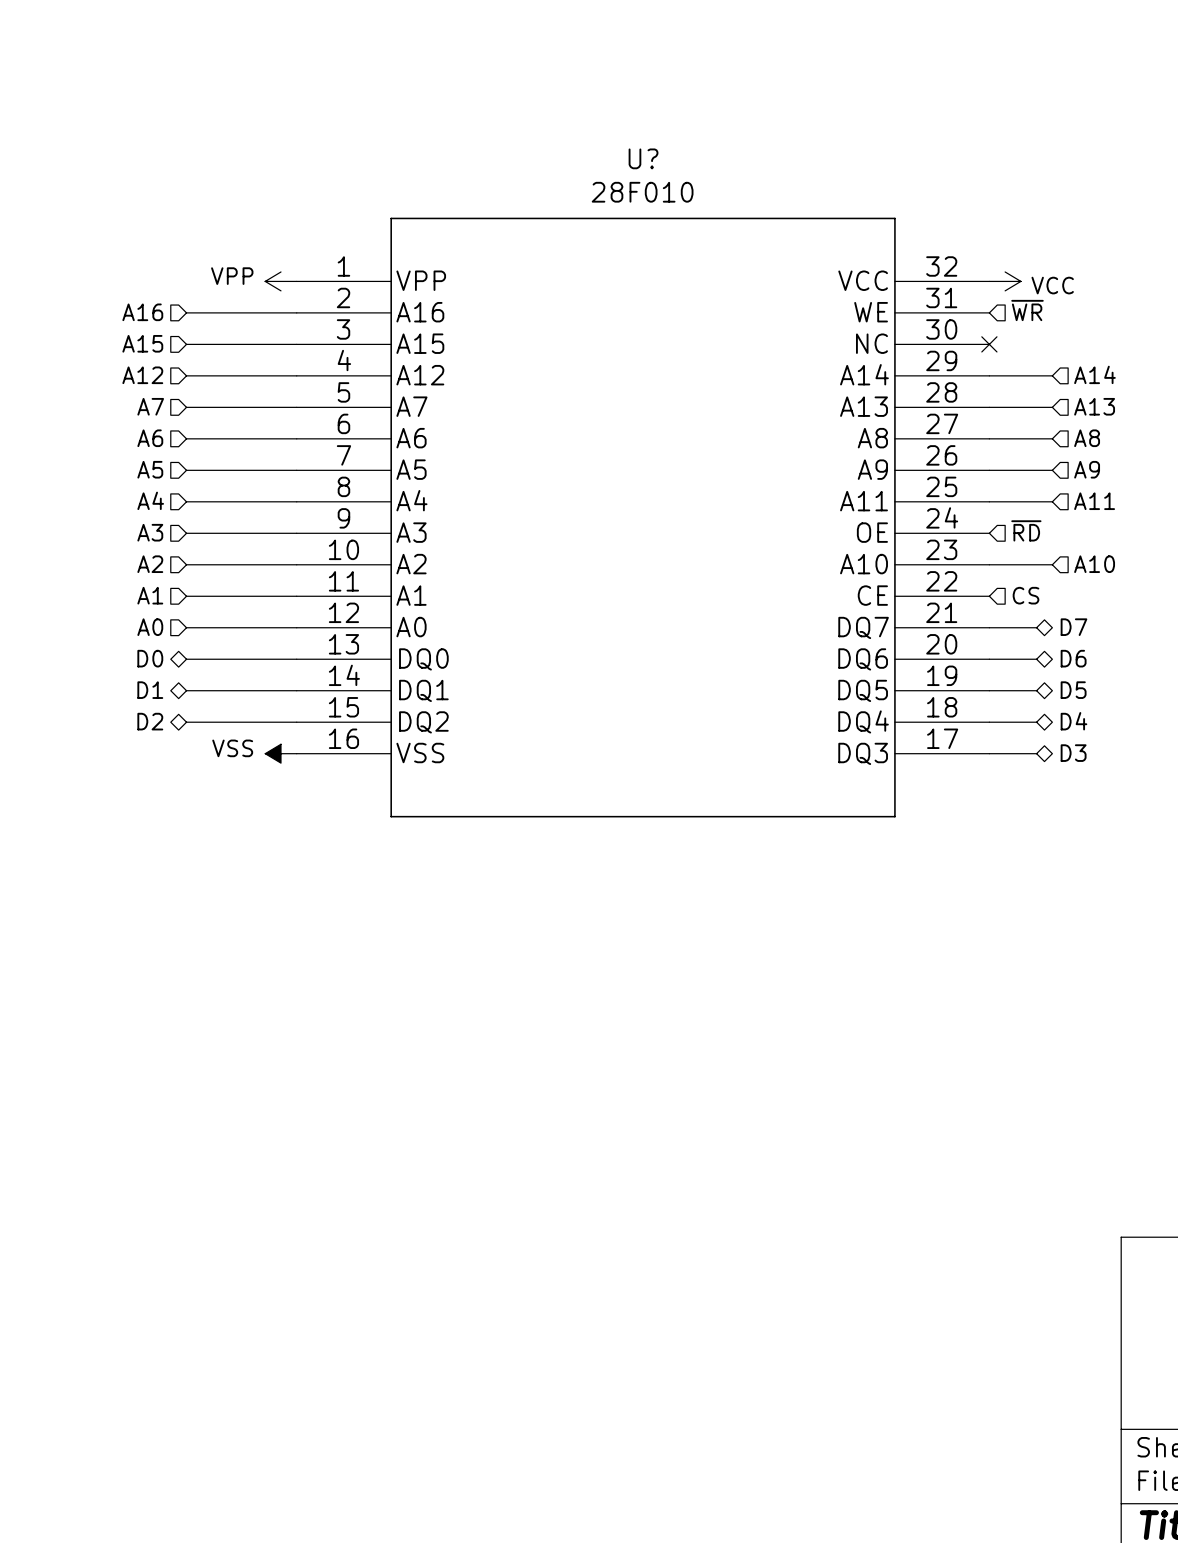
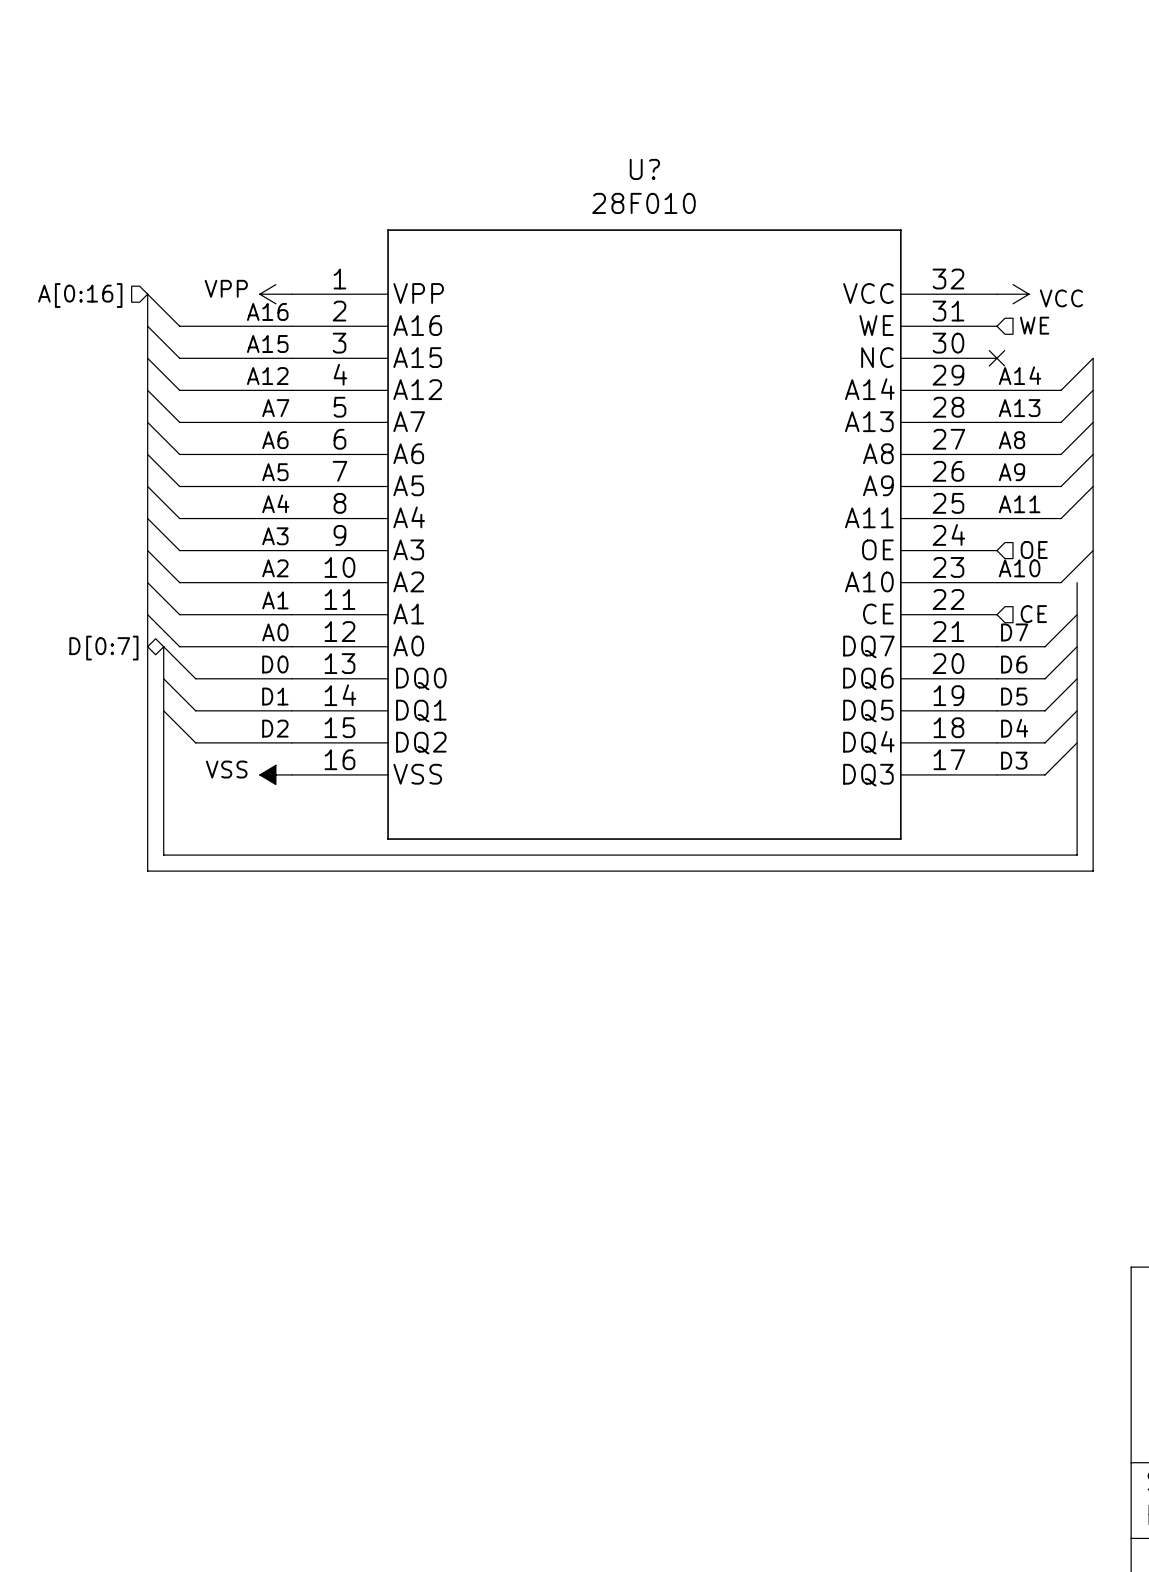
wire: none -> (147, 294) (179, 326)
bus: none -> (147, 294) (147, 871) (1093, 871) (1093, 358)
hierarchical label: none -> A[0:16] (80, 295)
label: none -> A16 (267, 311)
hierarchical label: ~{WR} (1027, 310) -> WE (1034, 325)
hierarchical label: A16 (142, 312) -> none
wire: none -> (147, 326) (179, 358)
label: none -> A15 (267, 344)
hierarchical label: A15 (142, 343) -> none
wire: none -> (147, 358) (179, 390)
wire: none -> (1093, 358) (1061, 390)
label: none -> A12 (267, 376)
label: none -> A14 (1019, 375)
hierarchical label: A14 (1094, 374) -> none
hierarchical label: A12 (142, 375) -> none
wire: none -> (147, 390) (179, 422)
wire: none -> (1093, 390) (1061, 422)
label: none -> A7 (275, 408)
label: none -> A13 (1019, 408)
hierarchical label: A7 (150, 406) -> none
hierarchical label: A13 (1094, 406) -> none
wire: none -> (147, 422) (179, 454)
wire: none -> (1093, 422) (1061, 454)
label: none -> A6 (275, 440)
label: none -> A8 (1011, 440)
hierarchical label: A6 (150, 438) -> none
wire: none -> (147, 454) (179, 486)
wire: none -> (1093, 454) (1061, 486)
hierarchical label: A8 (1087, 438) -> none
label: none -> A5 (275, 472)
label: none -> A9 (1011, 472)
hierarchical label: A5 (150, 469) -> none
hierarchical label: A9 (1087, 469) -> none
wire: none -> (147, 486) (179, 518)
wire: none -> (1093, 486) (1061, 518)
label: none -> A4 (275, 503)
label: none -> A11 (1019, 504)
hierarchical label: A4 (150, 500) -> none
wire: none -> (147, 518) (179, 550)
hierarchical label: A11 (1094, 501) -> none
label: none -> A3 (275, 536)
hierarchical label: ~{RD} (1026, 530) -> OE (1034, 550)
hierarchical label: A3 (150, 532) -> none
wire: none -> (147, 550) (179, 582)
wire: none -> (1093, 550) (1061, 582)
label: none -> A2 (275, 568)
label: none -> A10 (1019, 568)
hierarchical label: A2 (150, 564) -> none
wire: none -> (147, 582) (179, 614)
bus: none -> (1077, 582) (1077, 855) (163, 855) (163, 646)
hierarchical label: A10 (1094, 564) -> none
label: none -> A1 (275, 600)
hierarchical label: A1 (150, 595) -> none
hierarchical label: CS (1026, 595) -> CE (1033, 614)
wire: none -> (147, 614) (179, 646)
wire: none -> (1077, 614) (1045, 646)
label: none -> A0 (275, 632)
label: none -> D7 (1014, 632)
hierarchical label: A0 (150, 627) -> none
wire: none -> (1077, 646) (1045, 678)
hierarchical label: D7 (1073, 627) -> none
hierarchical label: none -> D[0:7] (103, 648)
label: none -> D0 (275, 664)
label: none -> D6 (1014, 664)
hierarchical label: D0 (150, 658) -> none
hierarchical label: D6 (1073, 658) -> none
wire: (186, 659) (202, 659) -> (163, 646) (195, 678)
wire: none -> (1077, 678) (1045, 710)
label: none -> D1 (275, 696)
label: none -> D5 (1014, 696)
hierarchical label: D1 (150, 690) -> none
wire: (186, 690) (202, 690) -> (163, 678) (195, 710)
wire: none -> (1077, 710) (1045, 742)
hierarchical label: D5 (1073, 690) -> none
label: none -> D4 (1014, 728)
label: none -> D2 (275, 728)
hierarchical label: D2 (150, 721) -> none
hierarchical label: D4 (1073, 721) -> none
wire: (186, 722) (202, 722) -> (163, 710) (195, 742)
wire: none -> (1077, 742) (1045, 774)
label: none -> D3 (1014, 760)
hierarchical label: D3 (1073, 753) -> none

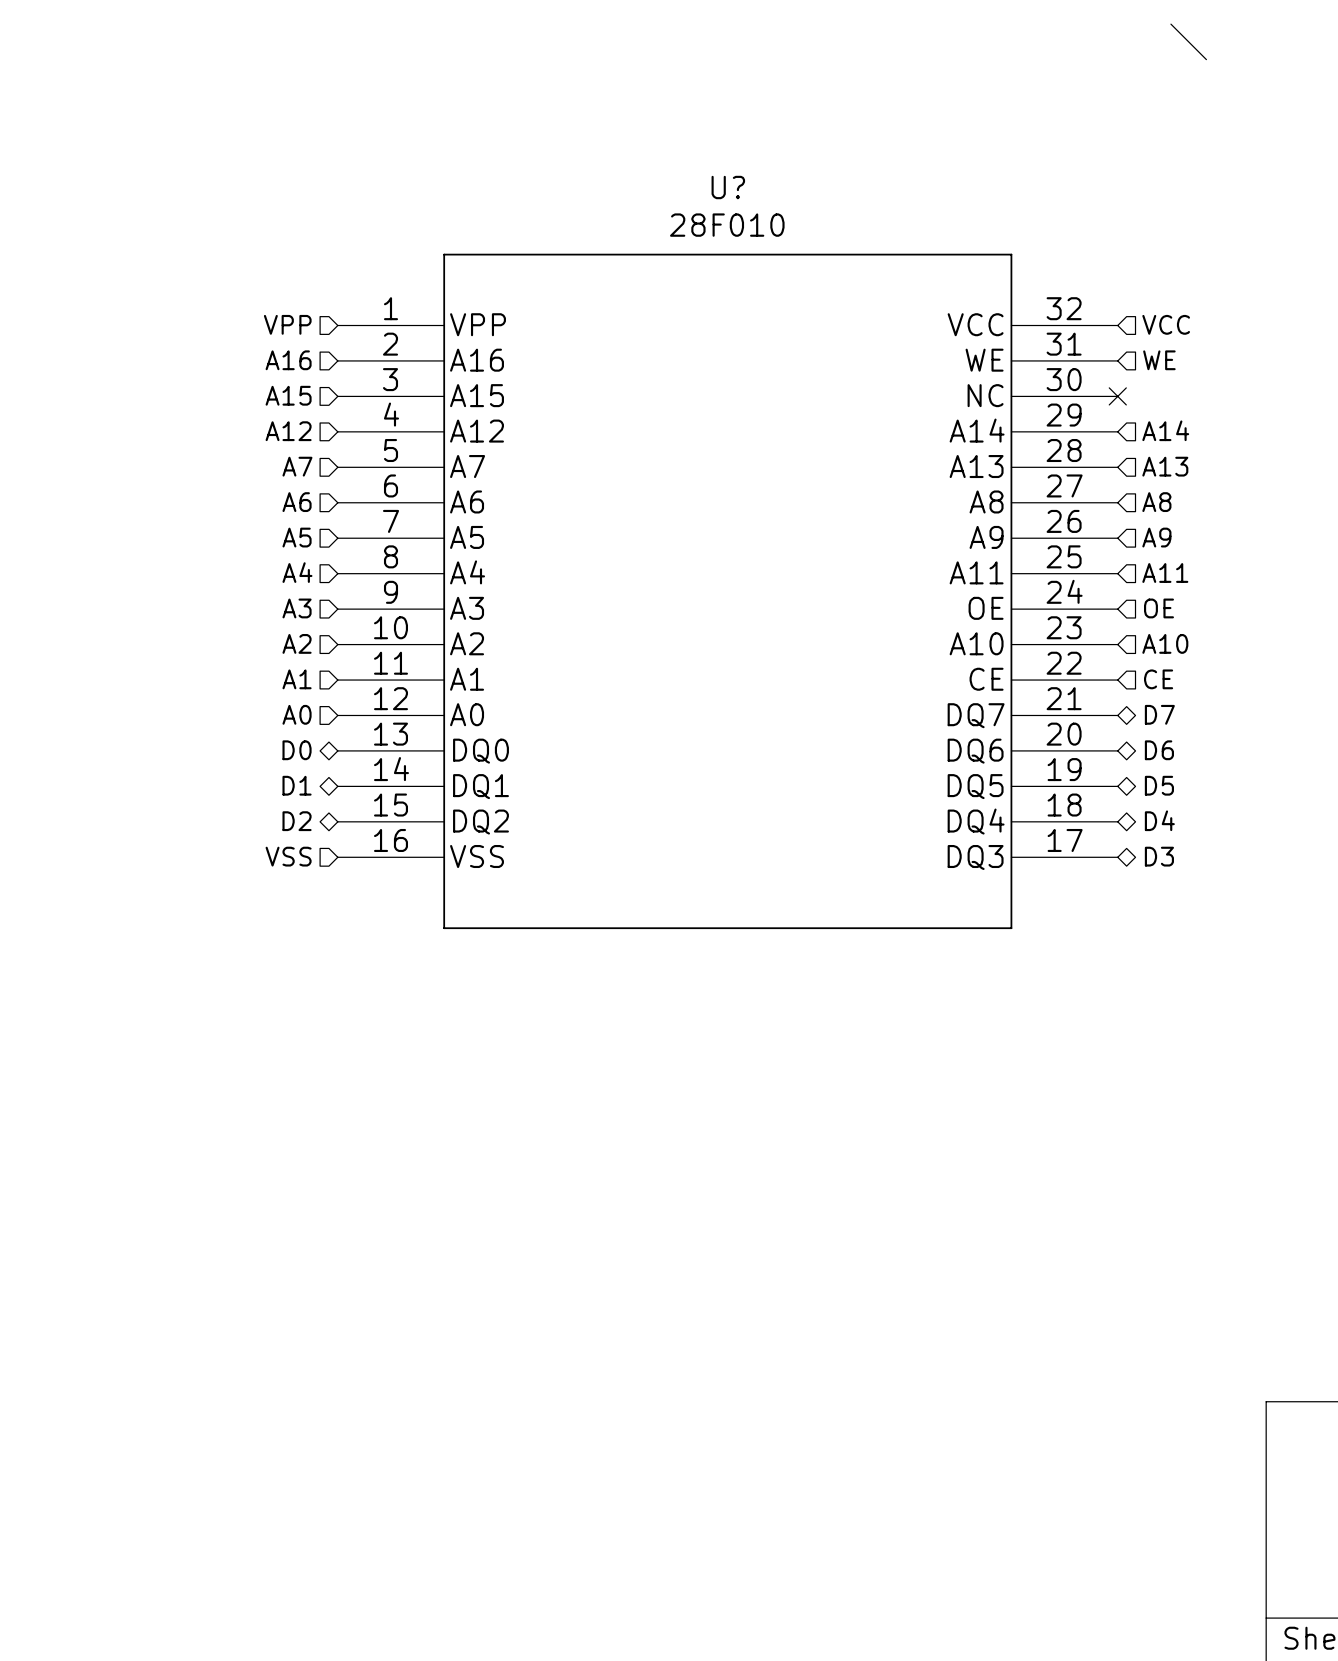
wire: none -> (1170, 24) (1206, 59)
hierarchical label: none -> VPP (287, 324)
hierarchical label: none -> VCC (1166, 324)
wire: (147, 294) (179, 326) (291, 326) -> none
bus: (147, 294) (147, 871) (1093, 871) (1093, 358) -> none
power symbol: VPP (275, 294) -> none
power symbol: VCC (1013, 294) -> none
hierarchical label: A[0:16] (80, 295) -> none
label: A16 (267, 311) -> none
hierarchical label: none -> A16 (288, 360)
wire: (147, 326) (179, 358) (291, 358) -> none
label: A15 (267, 344) -> none
hierarchical label: none -> A15 (288, 395)
wire: (147, 358) (179, 390) (291, 390) -> none
wire: (1093, 358) (1061, 390) (996, 390) -> none
label: A14 (1019, 375) -> none
label: A12 (267, 376) -> none
hierarchical label: none -> A12 (288, 431)
hierarchical label: none -> A14 (1165, 430)
wire: (147, 390) (179, 422) (291, 422) -> none
wire: (1093, 390) (1061, 422) (996, 422) -> none
label: A7 (275, 408) -> none
label: A13 (1019, 408) -> none
hierarchical label: none -> A7 (297, 466)
hierarchical label: none -> A13 (1165, 466)
wire: (147, 422) (179, 454) (291, 454) -> none
wire: (1093, 422) (1061, 454) (996, 454) -> none
label: A6 (275, 440) -> none
label: A8 (1011, 440) -> none
hierarchical label: none -> A6 (297, 502)
hierarchical label: none -> A8 (1156, 502)
wire: (147, 454) (179, 486) (291, 486) -> none
wire: (1093, 454) (1061, 486) (996, 486) -> none
label: A5 (275, 472) -> none
label: A9 (1011, 472) -> none
hierarchical label: none -> A5 (297, 537)
hierarchical label: none -> A9 (1156, 537)
wire: (147, 486) (179, 518) (291, 518) -> none
wire: (1093, 486) (1061, 518) (996, 518) -> none
label: A4 (275, 503) -> none
label: A11 (1019, 504) -> none
hierarchical label: none -> A4 (297, 572)
hierarchical label: none -> A11 (1165, 573)
wire: (147, 518) (179, 550) (291, 550) -> none
label: A3 (275, 536) -> none
wire: (147, 550) (179, 582) (291, 582) -> none
hierarchical label: none -> A3 (297, 608)
wire: (1093, 550) (1061, 582) (996, 582) -> none
label: A2 (275, 568) -> none
label: A10 (1019, 568) -> none
wire: (147, 582) (179, 614) (291, 614) -> none
hierarchical label: none -> A2 (297, 643)
hierarchical label: none -> A10 (1165, 643)
bus: (1077, 582) (1077, 855) (163, 855) (163, 646) -> none
label: A1 (275, 600) -> none
wire: (147, 614) (179, 646) (291, 646) -> none
hierarchical label: none -> A1 (297, 679)
wire: (1077, 614) (1045, 646) (996, 646) -> none
label: A0 (275, 632) -> none
label: D7 (1014, 632) -> none
wire: (163, 646) (195, 678) (291, 678) -> none
hierarchical label: none -> A0 (297, 714)
hierarchical label: none -> D7 (1159, 714)
wire: (1077, 646) (1045, 678) (996, 678) -> none
hierarchical label: D[0:7] (103, 648) -> none
label: D0 (275, 664) -> none
label: D6 (1014, 664) -> none
wire: (163, 678) (195, 710) (291, 710) -> none
hierarchical label: none -> D0 (297, 750)
hierarchical label: none -> D6 (1159, 750)
wire: (1077, 678) (1045, 710) (996, 710) -> none
label: D1 (275, 696) -> none
label: D5 (1014, 696) -> none
wire: (163, 710) (195, 742) (291, 742) -> none
hierarchical label: none -> D1 (297, 785)
hierarchical label: none -> D5 (1159, 785)
wire: (1077, 710) (1045, 742) (996, 742) -> none
label: D2 (275, 728) -> none
label: D4 (1014, 728) -> none
hierarchical label: none -> D4 (1159, 820)
hierarchical label: none -> D2 (297, 821)
wire: (1077, 742) (1045, 774) (996, 774) -> none
label: D3 (1014, 760) -> none
hierarchical label: none -> VSS (288, 856)
power symbol: VSS (275, 774) -> none
hierarchical label: none -> D3 (1159, 856)

